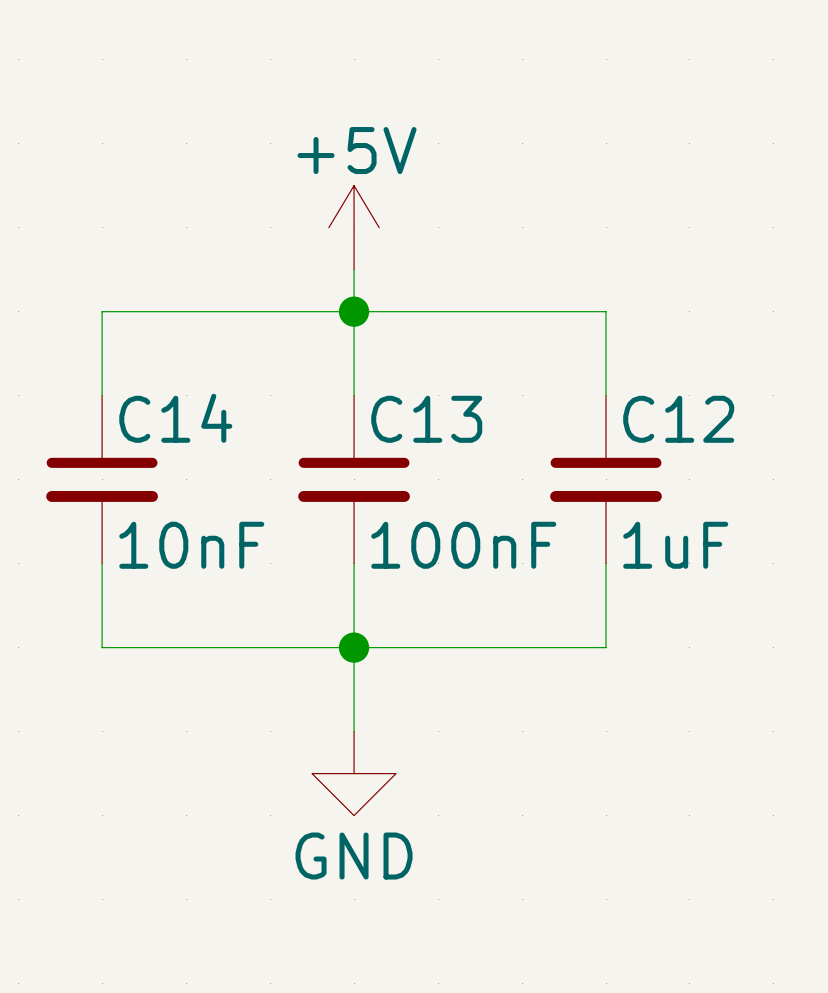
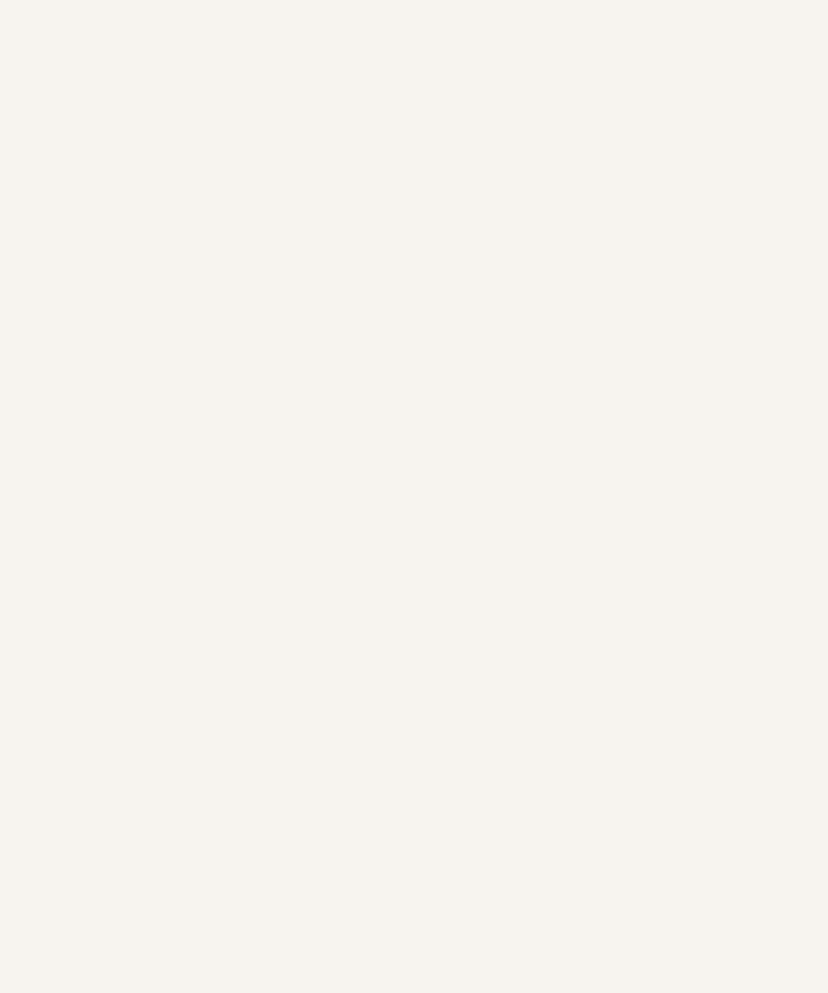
power symbol: +5V (354, 227) -> none
wire: (354, 269) (354, 395) -> none
junction: (354, 311) -> none
wire: (102, 395) (102, 311) (606, 311) (606, 395) -> none
C14: 10nF (102, 479) -> none
C13: 100nF (354, 479) -> none
C12: 1uF (606, 479) -> none
wire: (102, 563) (102, 647) (606, 647) (606, 563) -> none
wire: (354, 563) (354, 731) -> none
junction: (354, 647) -> none
power symbol: GND (354, 773) -> none

